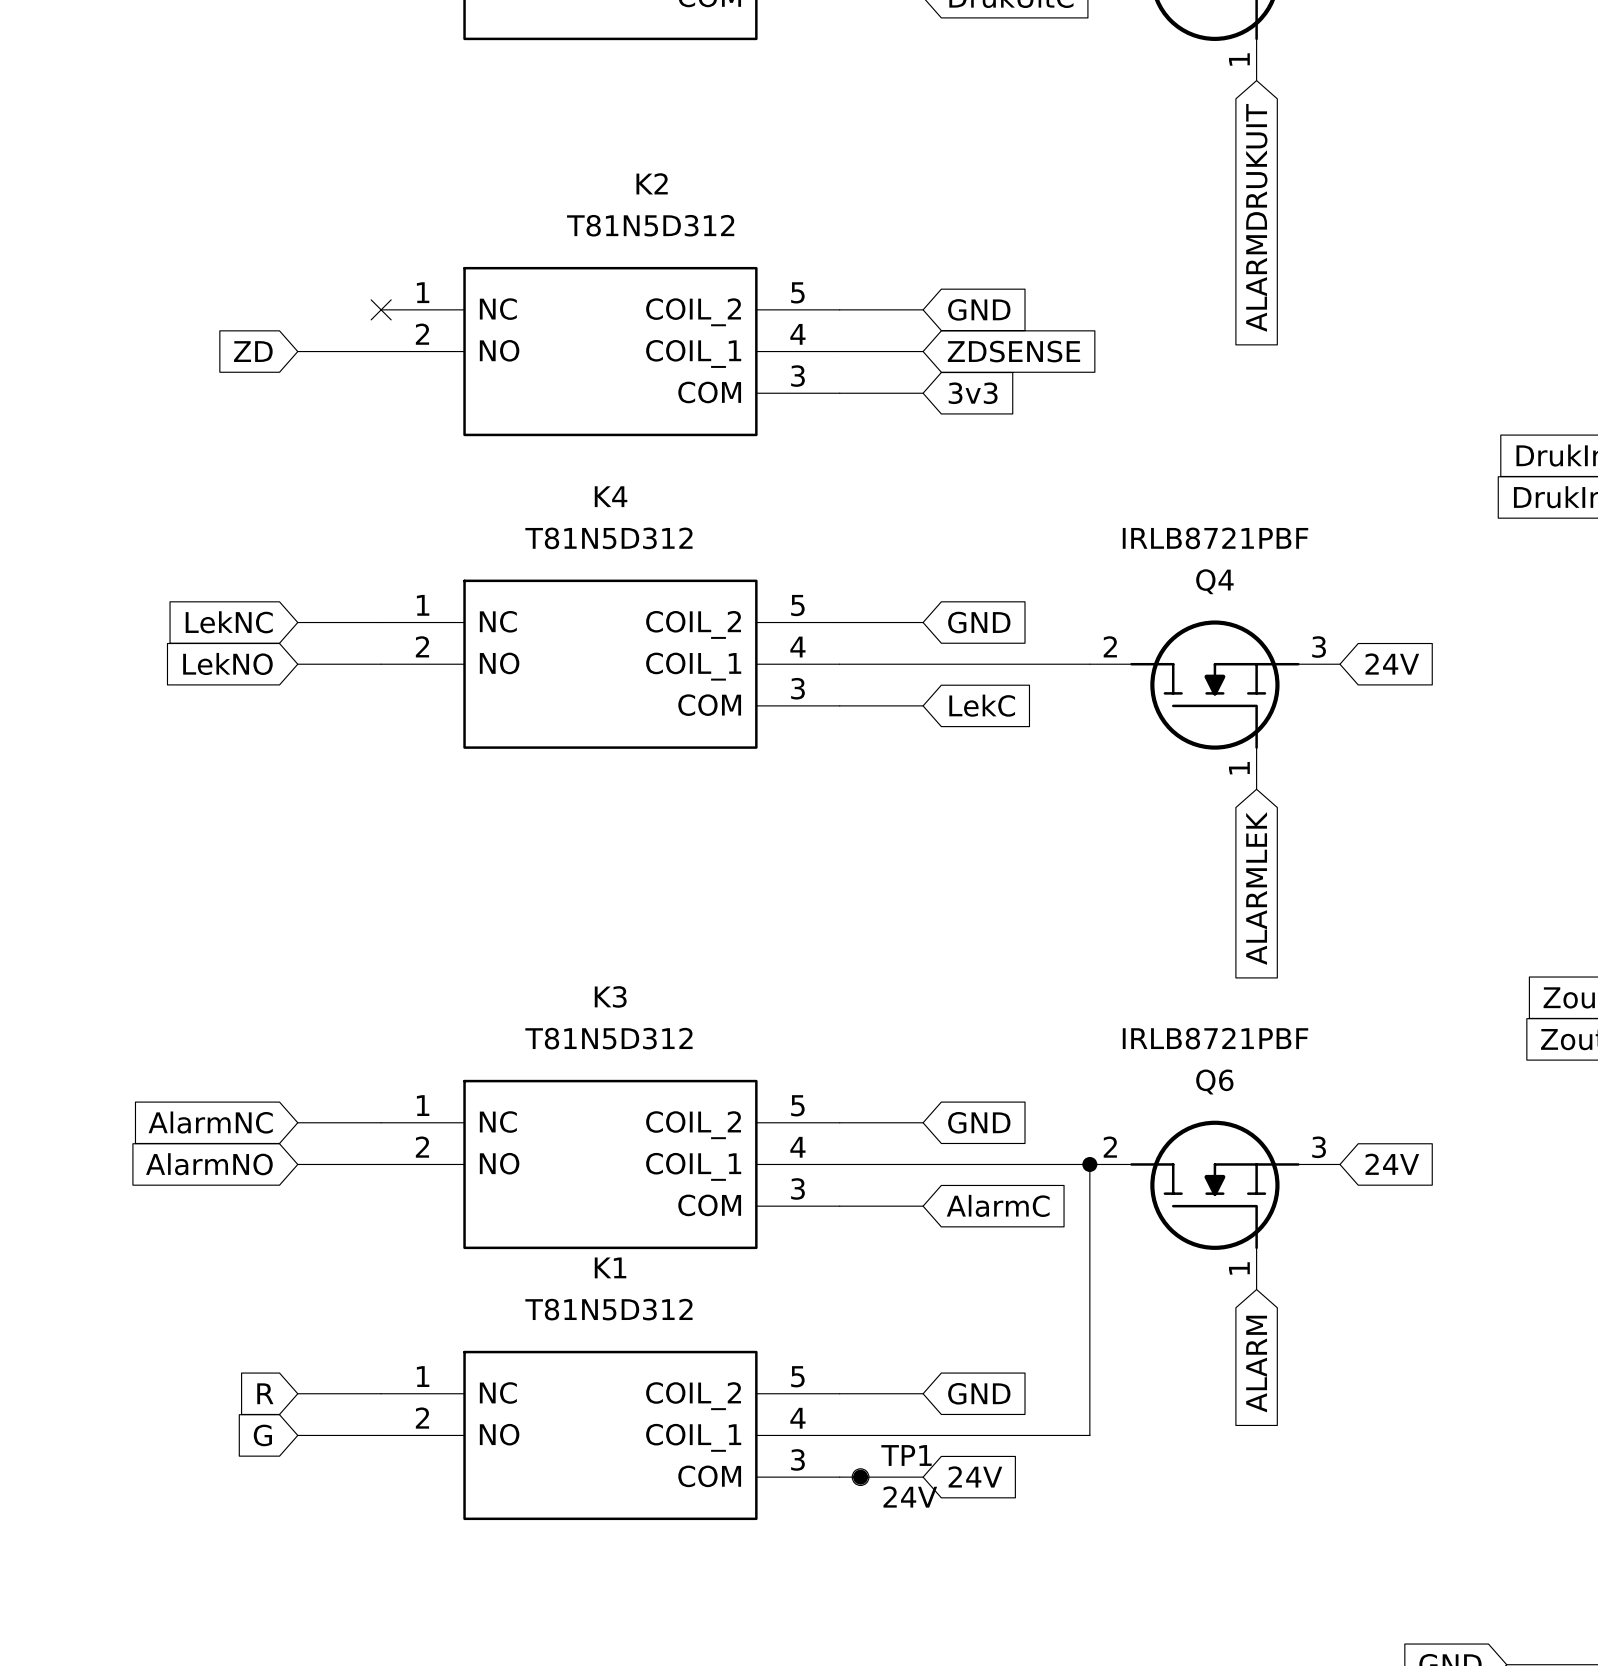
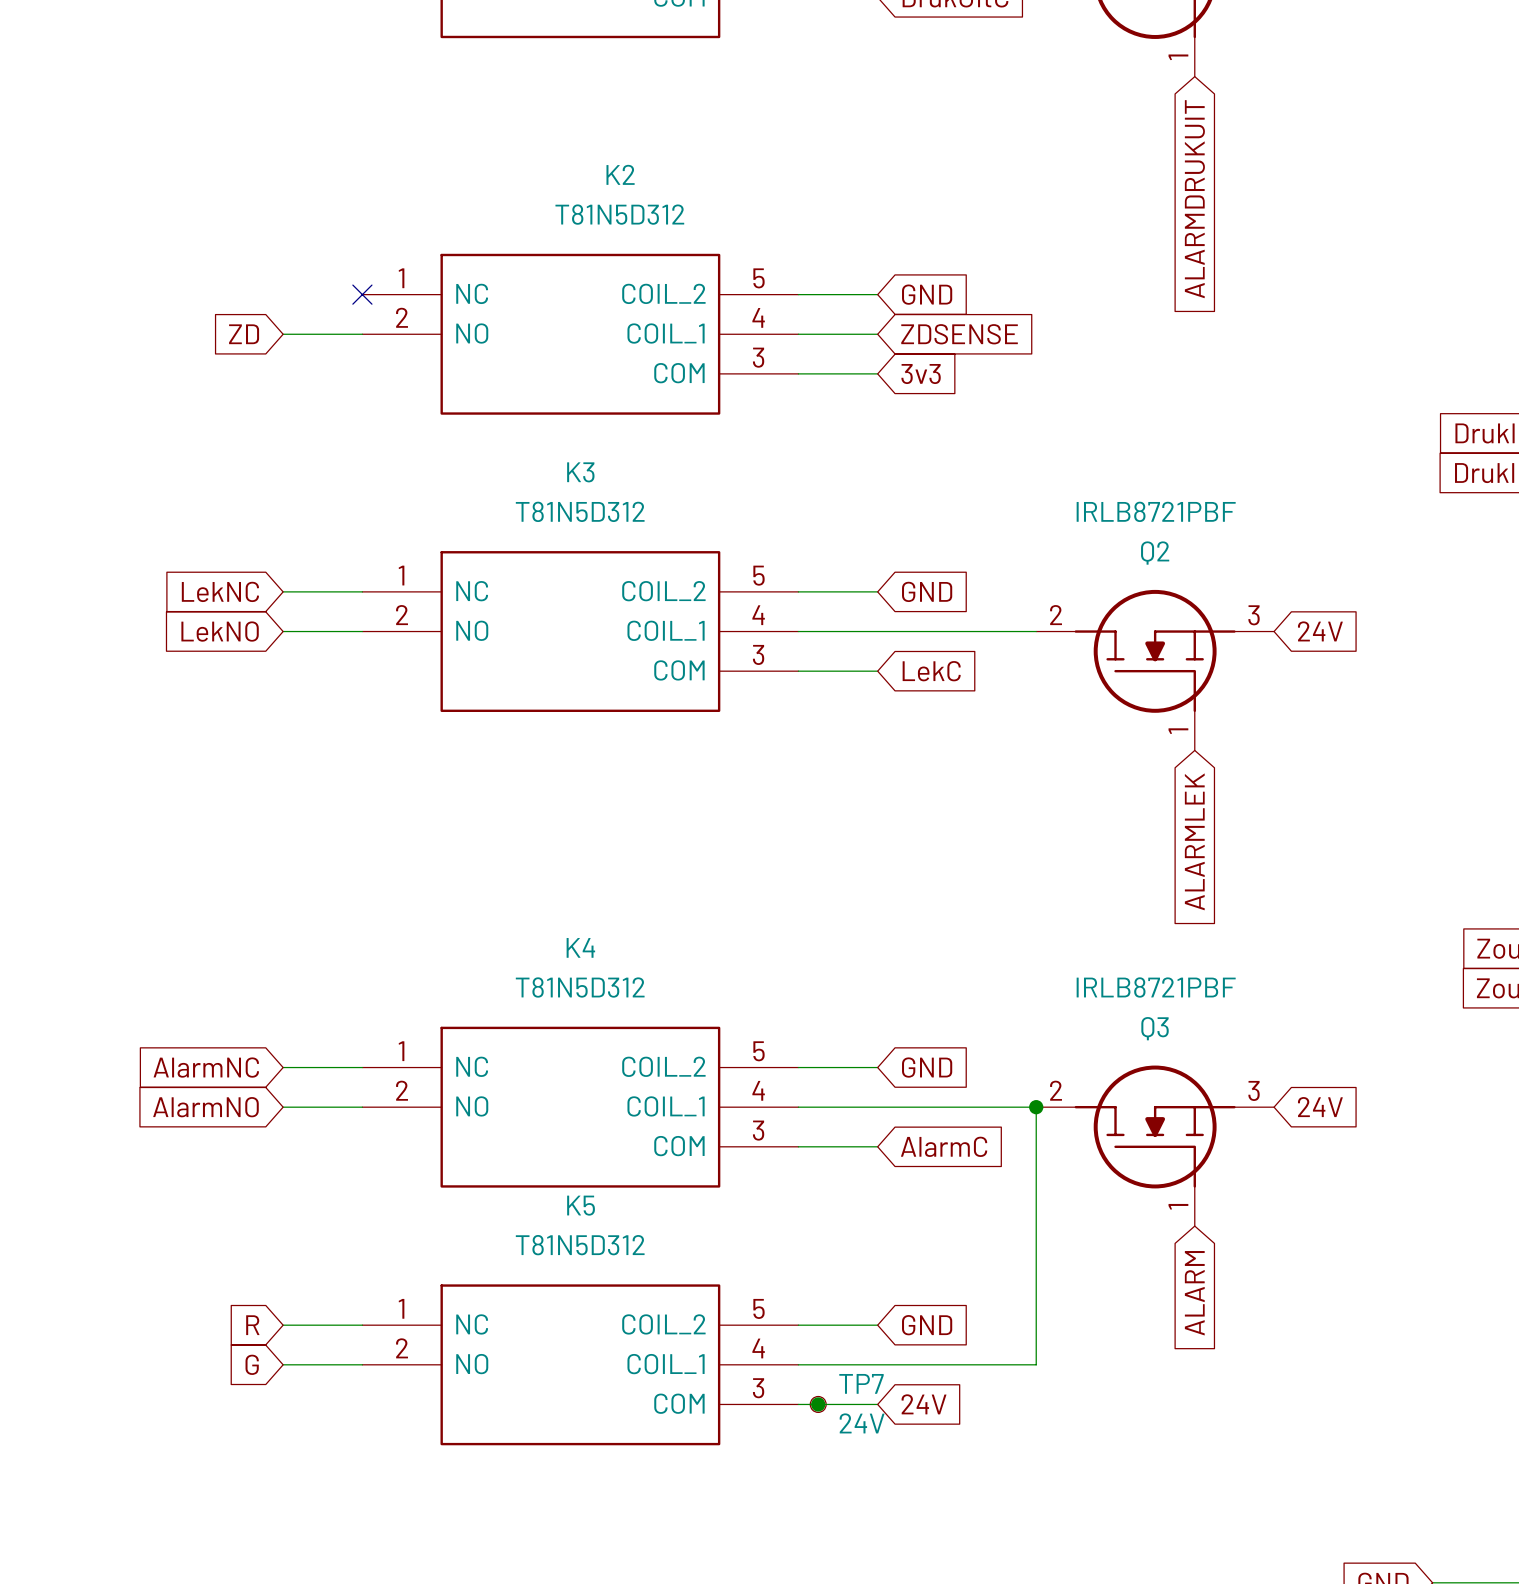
K4 name: K4 (611, 496) -> K3 (580, 472)
Q4 name: Q4 (1214, 581) -> Q2 (1155, 553)
K3 name: K3 (610, 996) -> K4 (580, 947)
Q6 name: Q6 (1214, 1081) -> Q3 (1155, 1028)
K1 name: K1 (610, 1267) -> K5 (581, 1205)
TP1 name: TP1 (906, 1455) -> TP7 (861, 1383)

